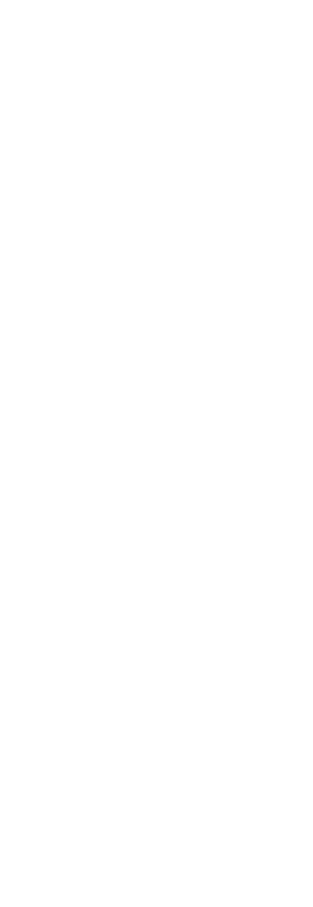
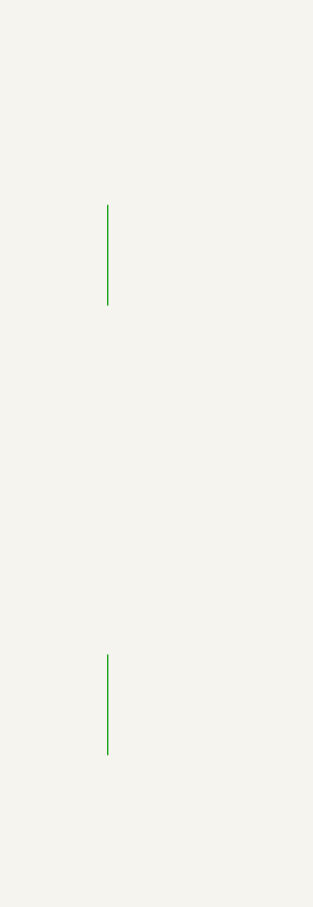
wire: none -> (107, 205) (107, 305)
wire: none -> (107, 654) (107, 754)

